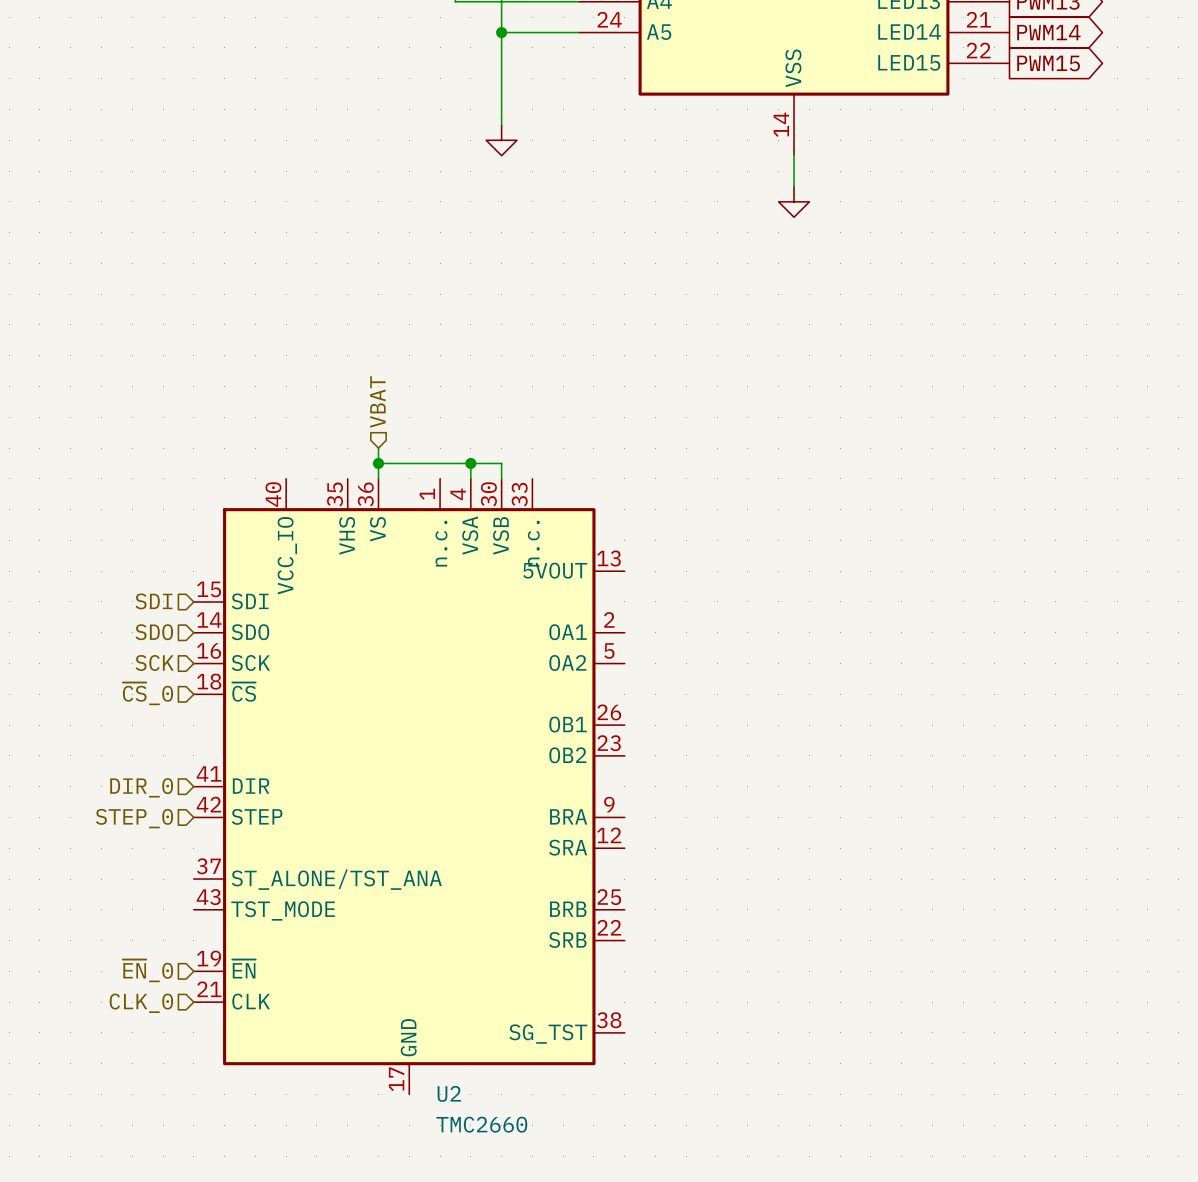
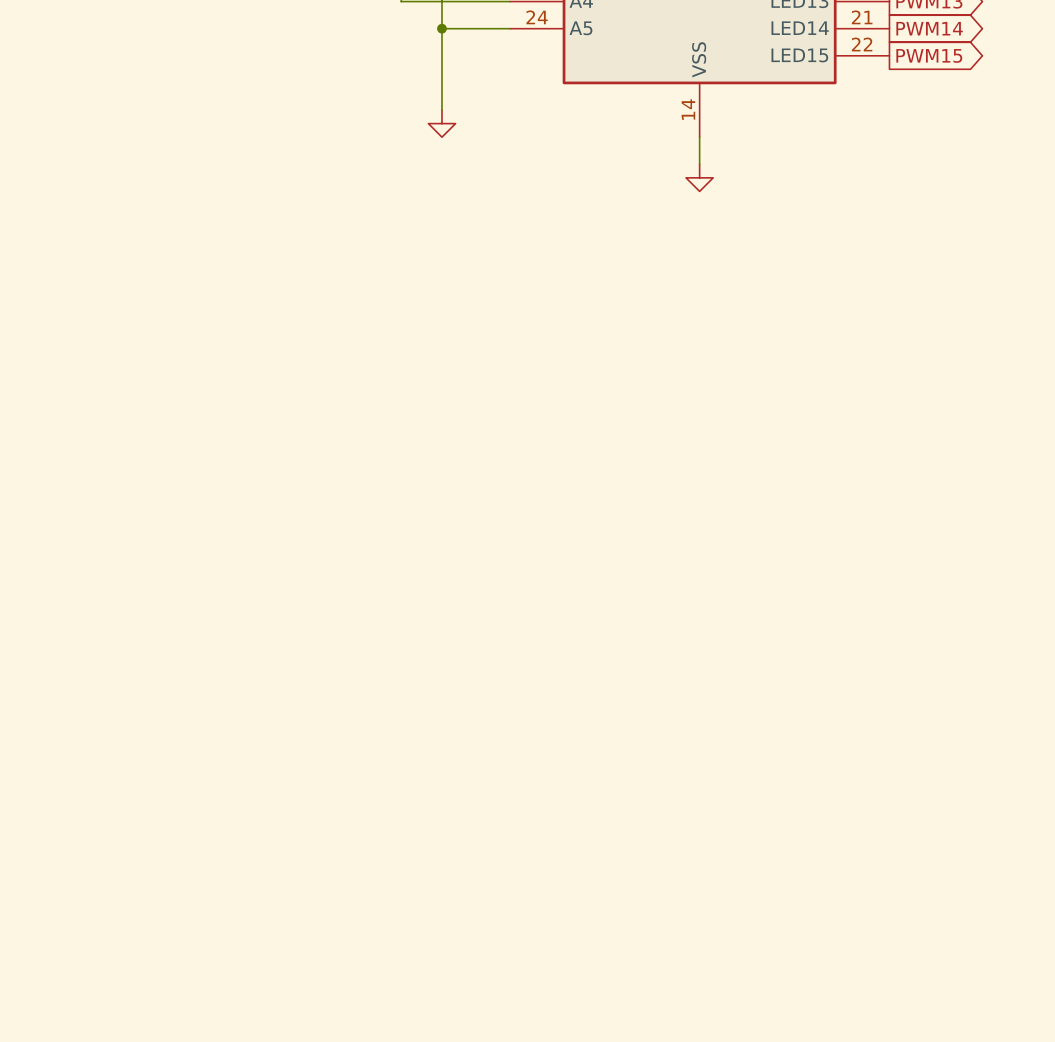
hierarchical label: VBAT (377, 401) -> none
wire: (378, 448) (378, 478) -> none
wire: (378, 463) (501, 463) (501, 478) -> none
junction: (378, 463) -> none
wire: (470, 463) (470, 478) -> none
junction: (470, 463) -> none
hierarchical label: SDI (153, 601) -> none
hierarchical label: SDO (154, 632) -> none
hierarchical label: SCK (154, 662) -> none
hierarchical label: ~{CS}_0 (147, 693) -> none
U2: TMC2660 (409, 786) -> none
hierarchical label: DIR_0 (141, 787) -> none
hierarchical label: STEP_0 (134, 818) -> none
hierarchical label: ~{EN}_0 (147, 970) -> none
hierarchical label: CLK_0 (141, 1003) -> none

